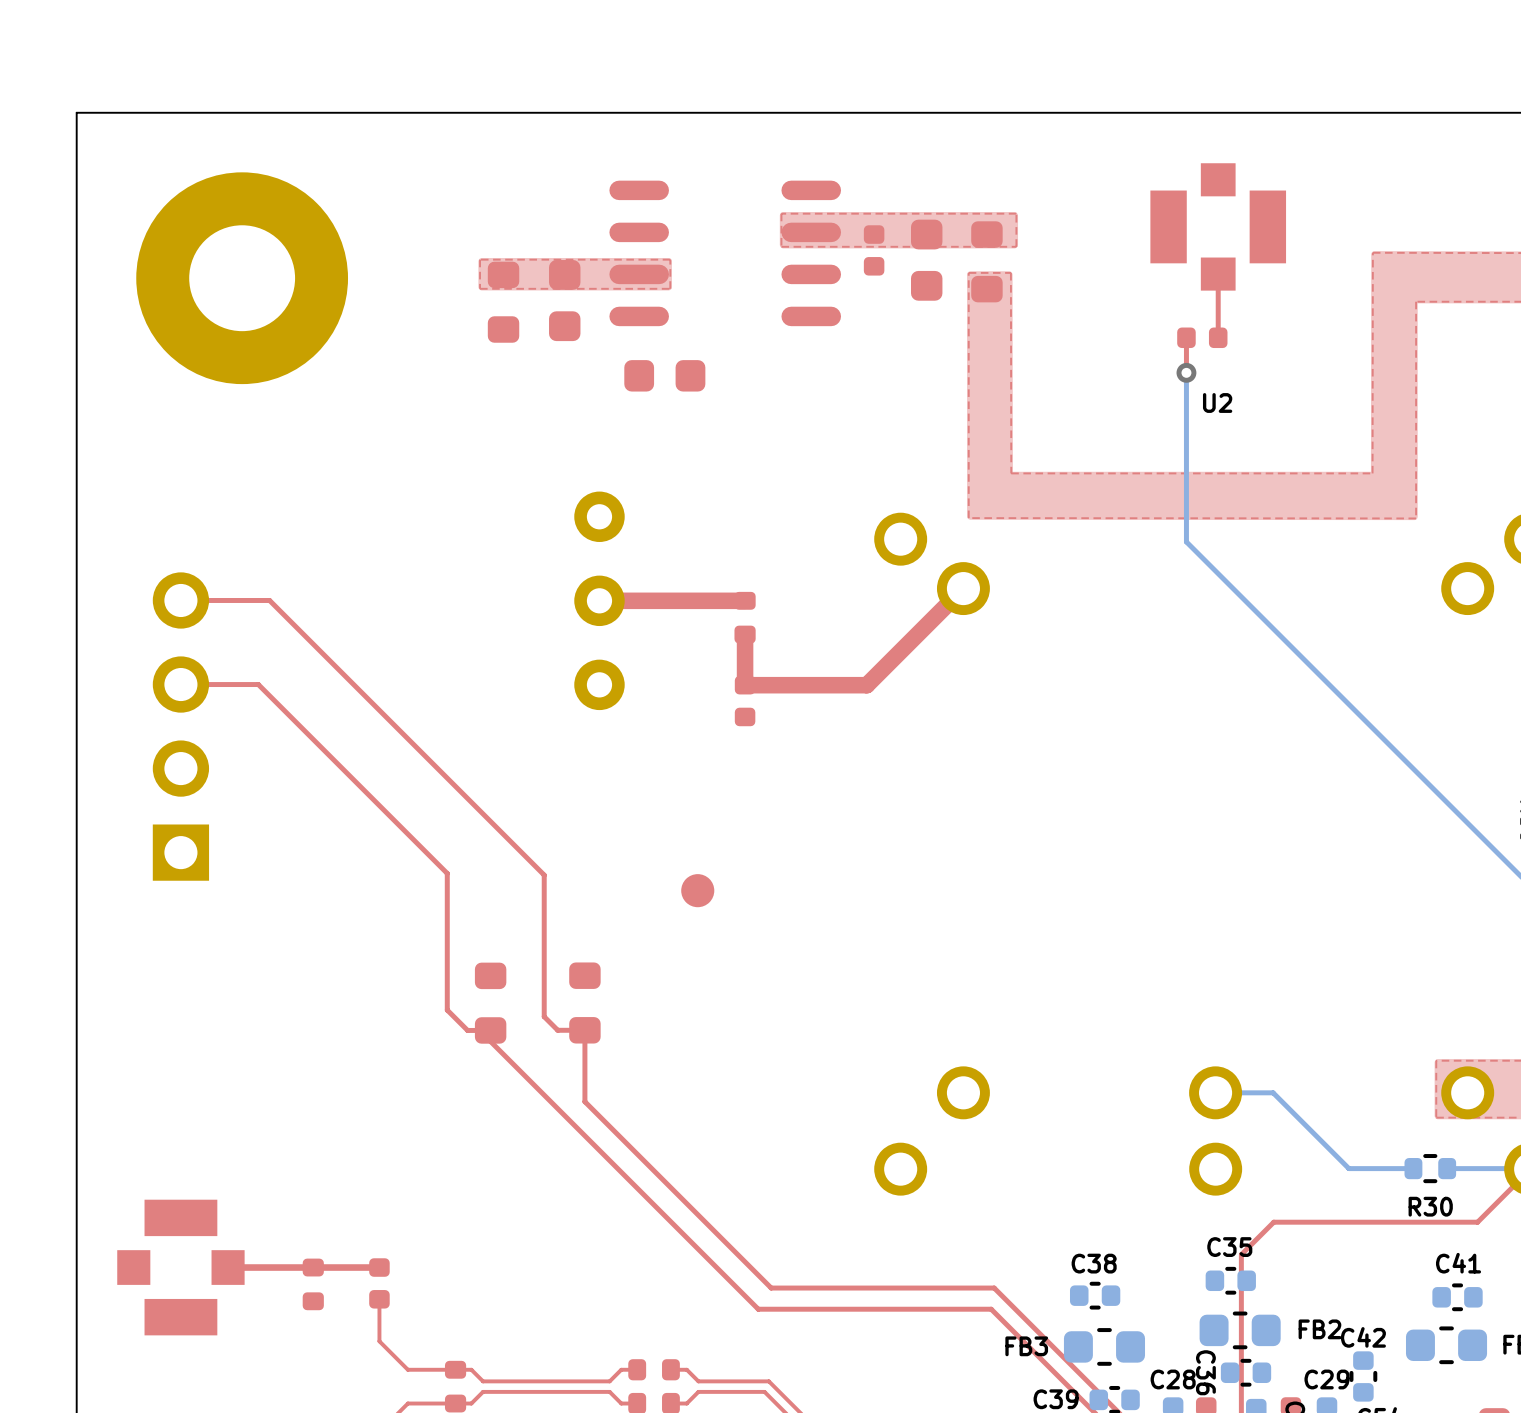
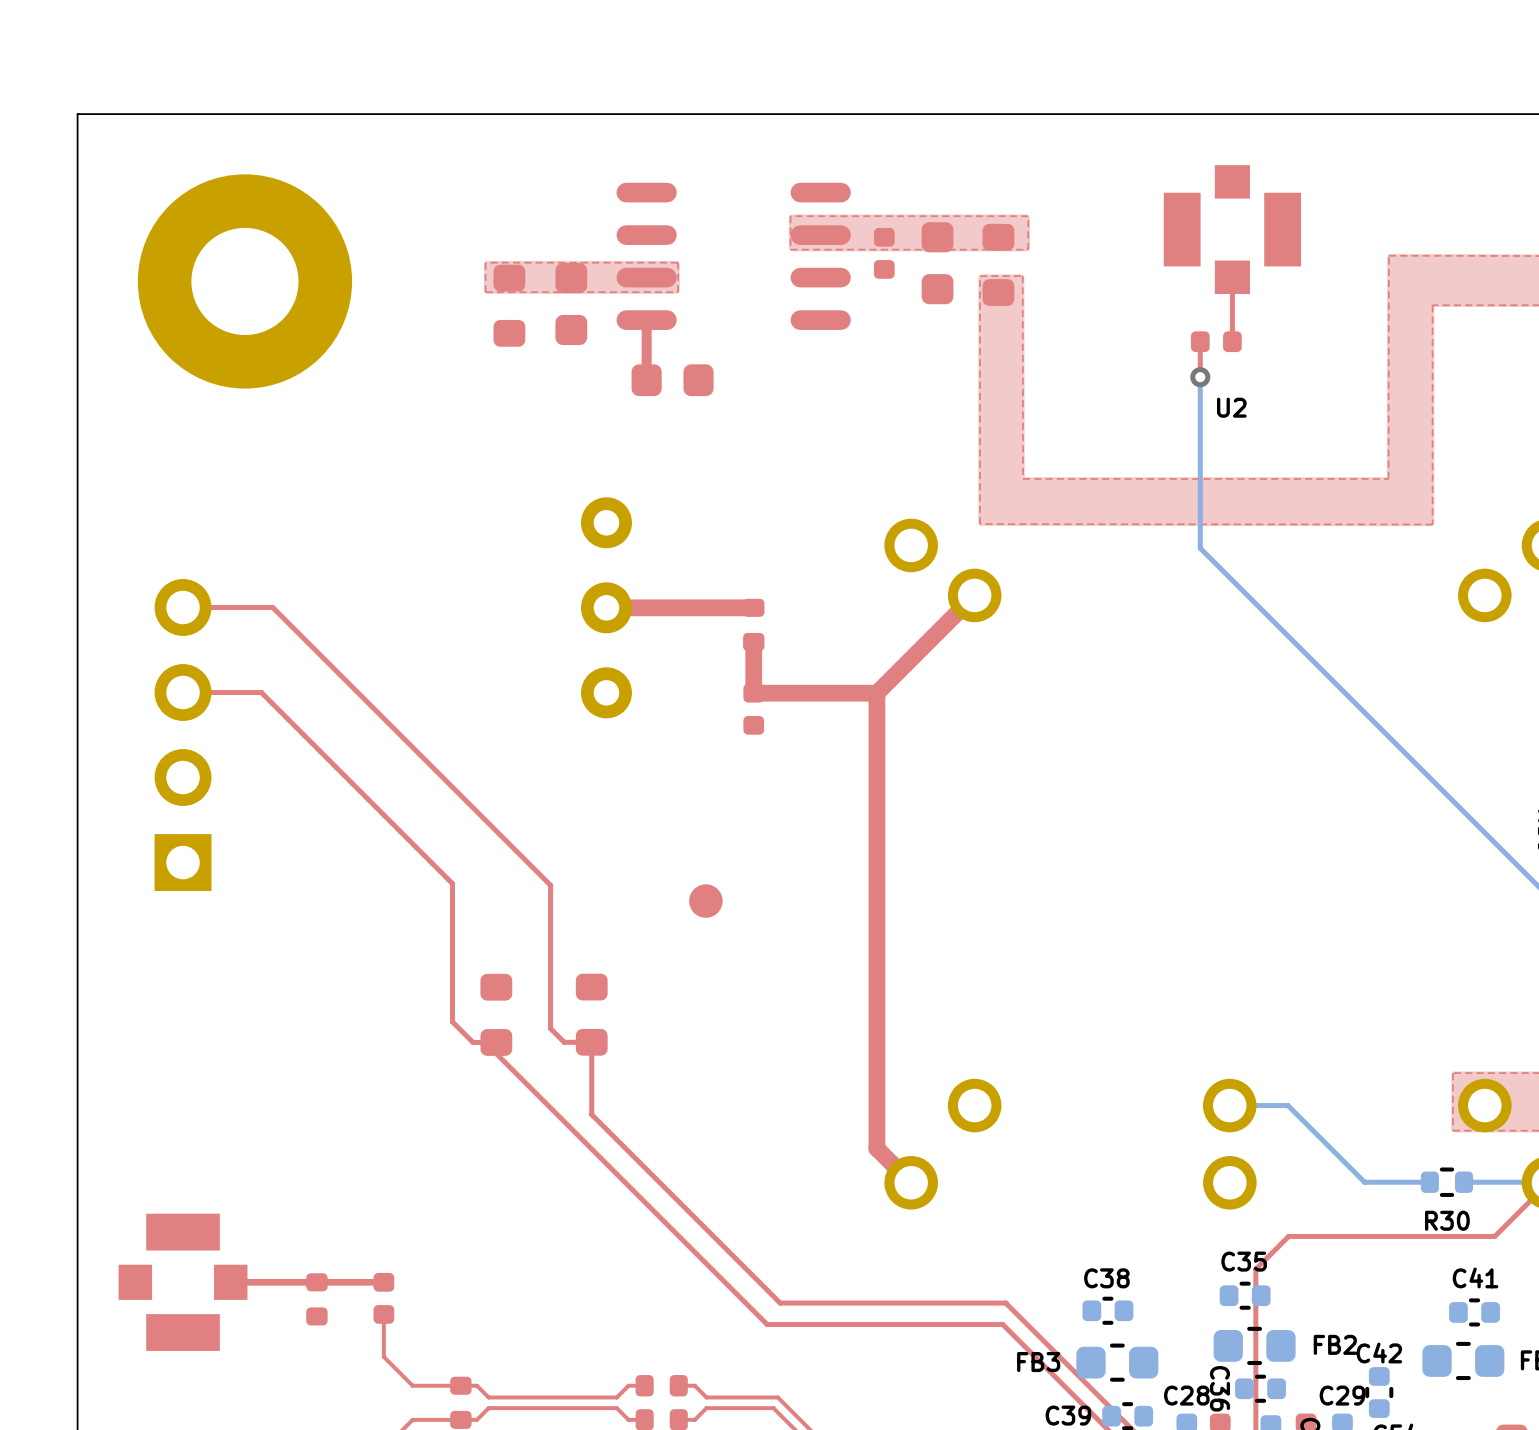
top track: none -> (646, 320) (646, 380)
top track: none -> (876, 693) (876, 1148) (911, 1182)

